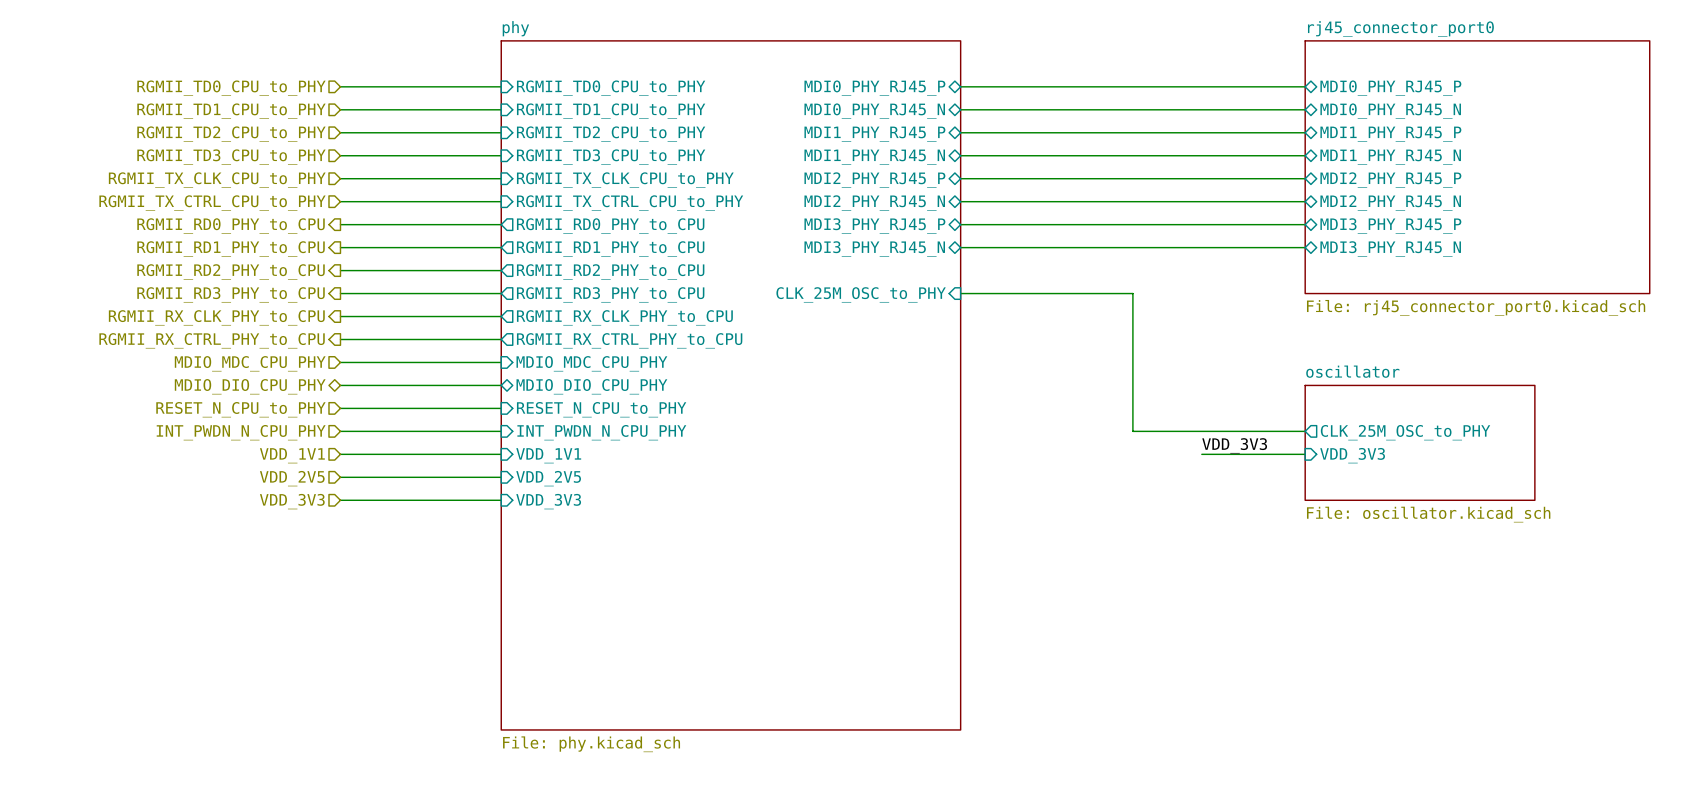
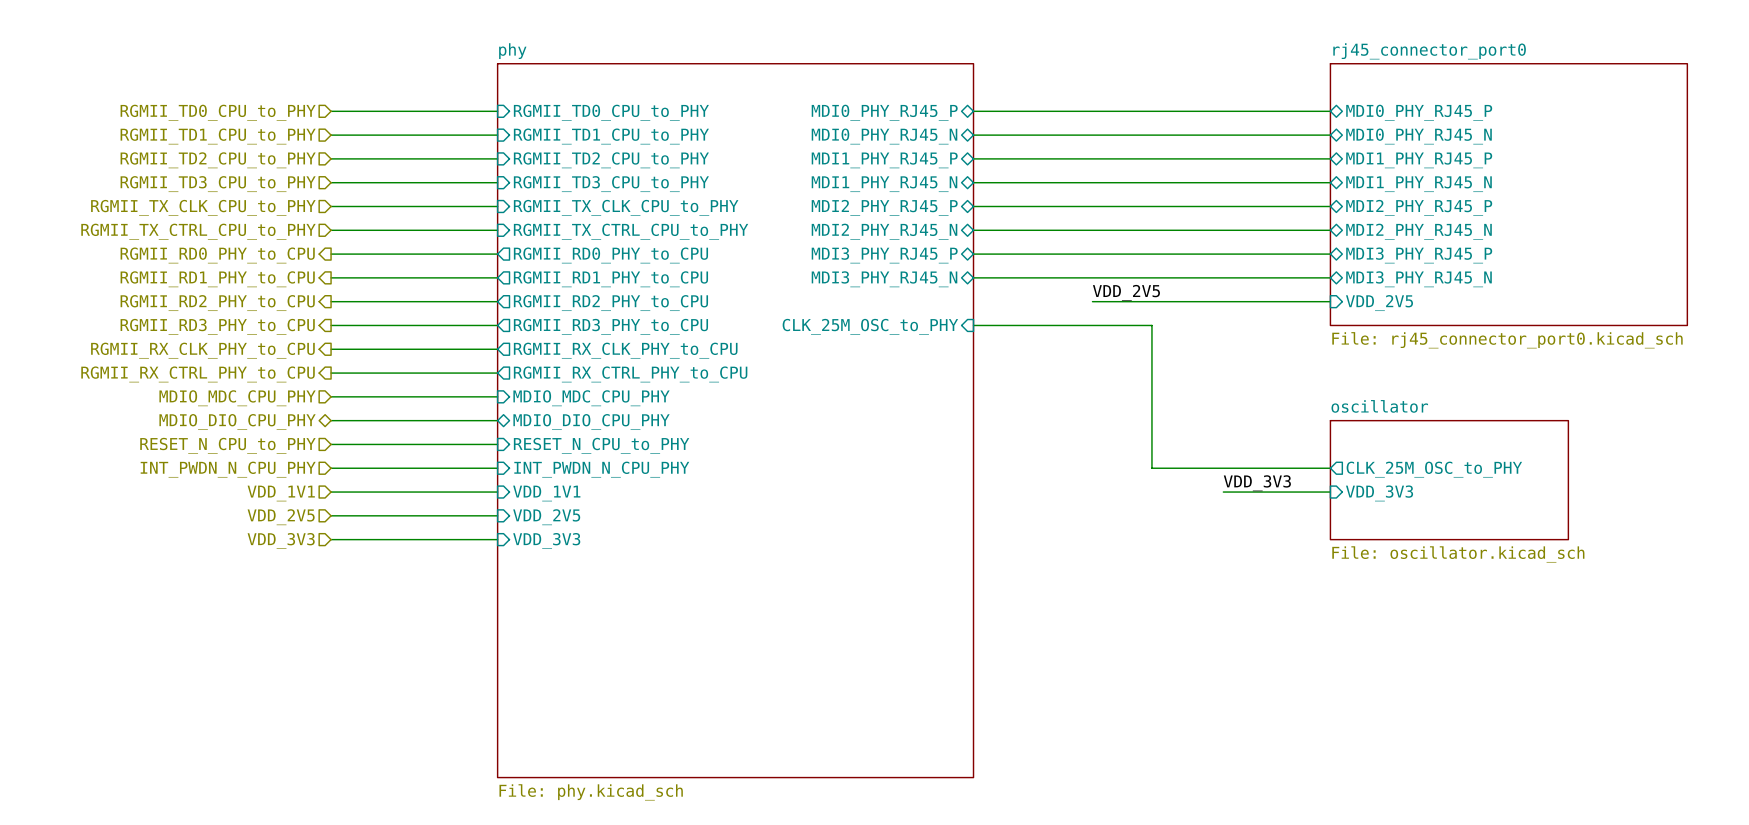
label: none -> VDD_2V5 (1126, 292)
wire: none -> (1092, 301) (1330, 301)
sheet pin: none -> VDD_2V5 (1379, 303)

